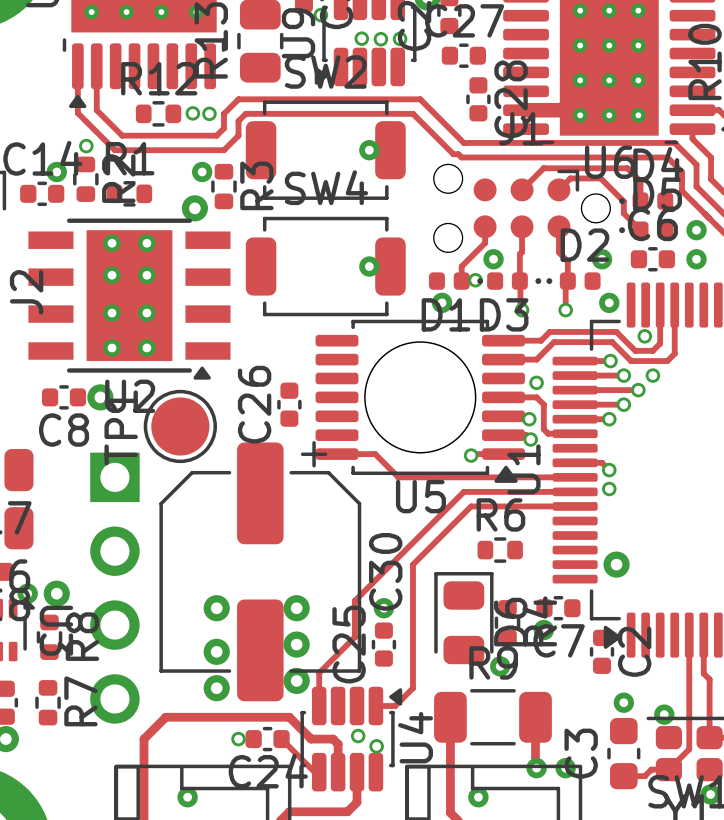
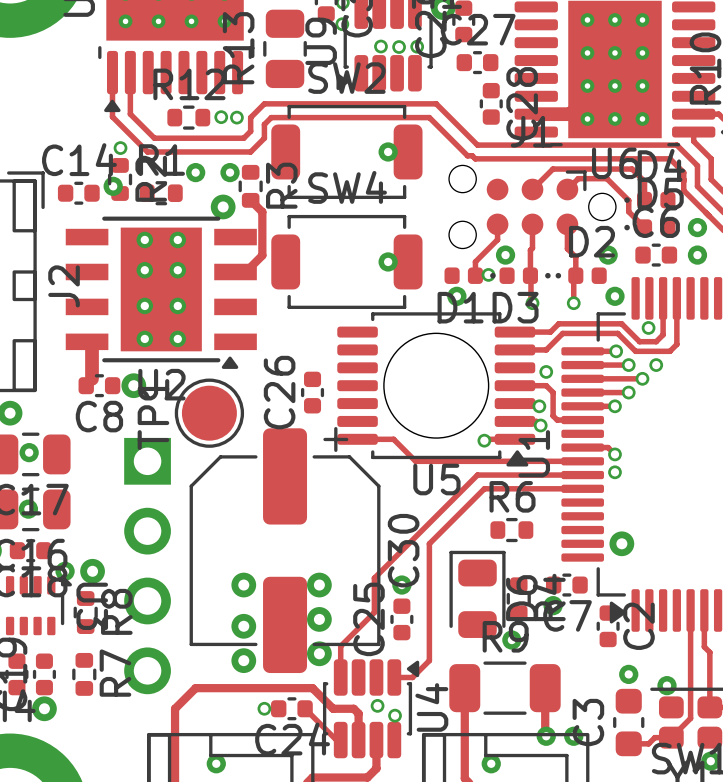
via position: (56, 172) -> (113, 186)
via: none -> (195, 172)
track: none -> (250, 200) (262, 212) (262, 255) (245, 271) (232, 271)
track: none -> (84, 341) (89, 341) (92, 344) (92, 378)

